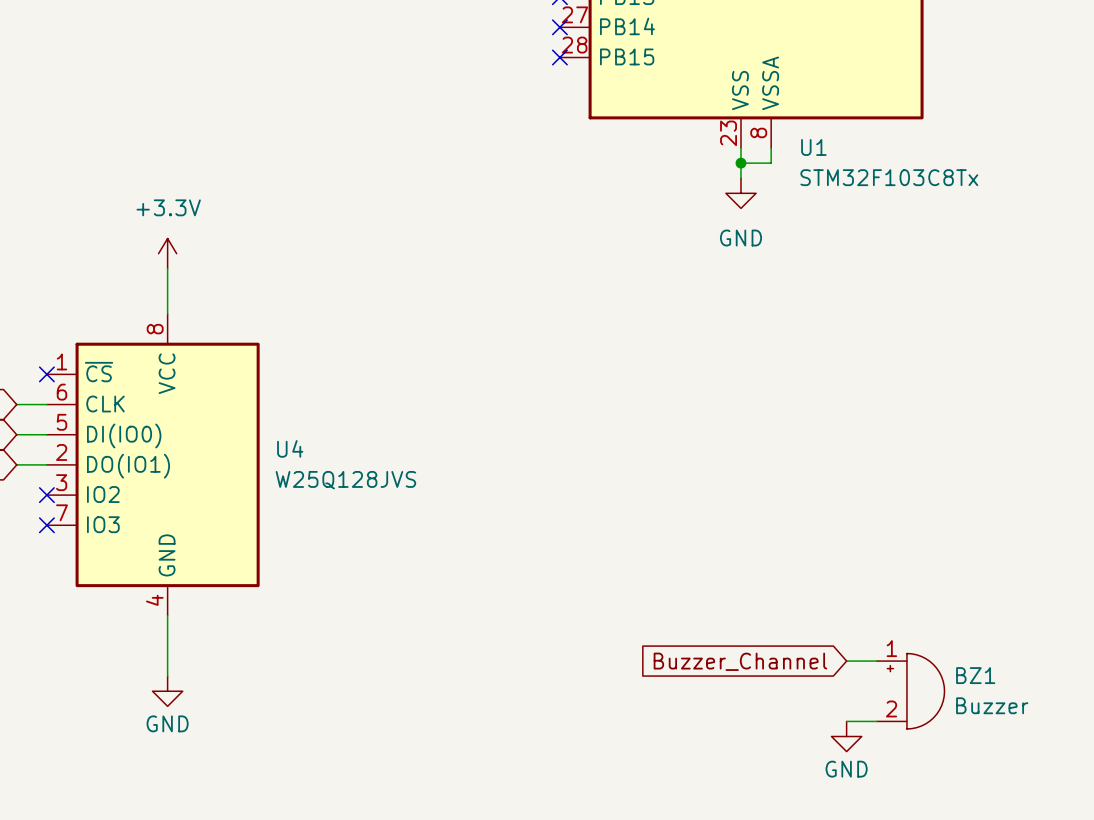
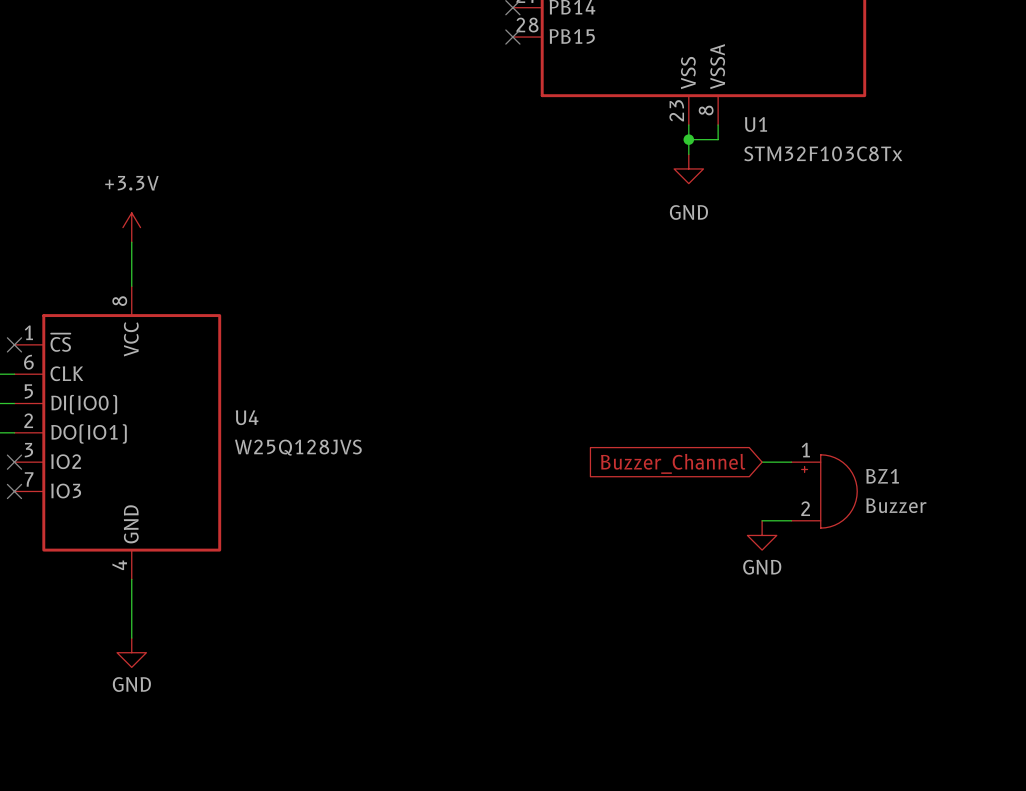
global label position: Buzzer_Channel (740, 661) -> Buzzer_Channel (673, 463)
wire: (846, 661) (876, 661) -> (762, 462) (791, 462)
BZ1 position: (910, 691) -> (824, 491)
wire: (846, 721) (876, 721) -> (762, 520) (791, 520)
power symbol position: GND (846, 736) -> GND (762, 535)

